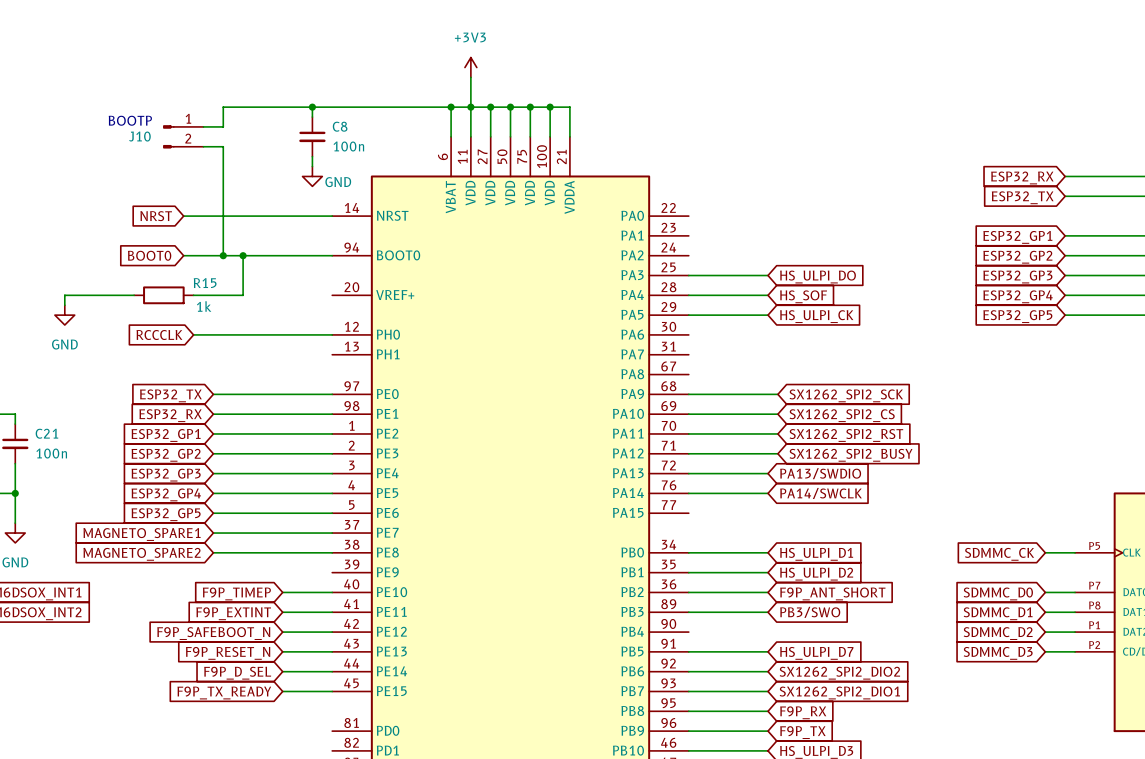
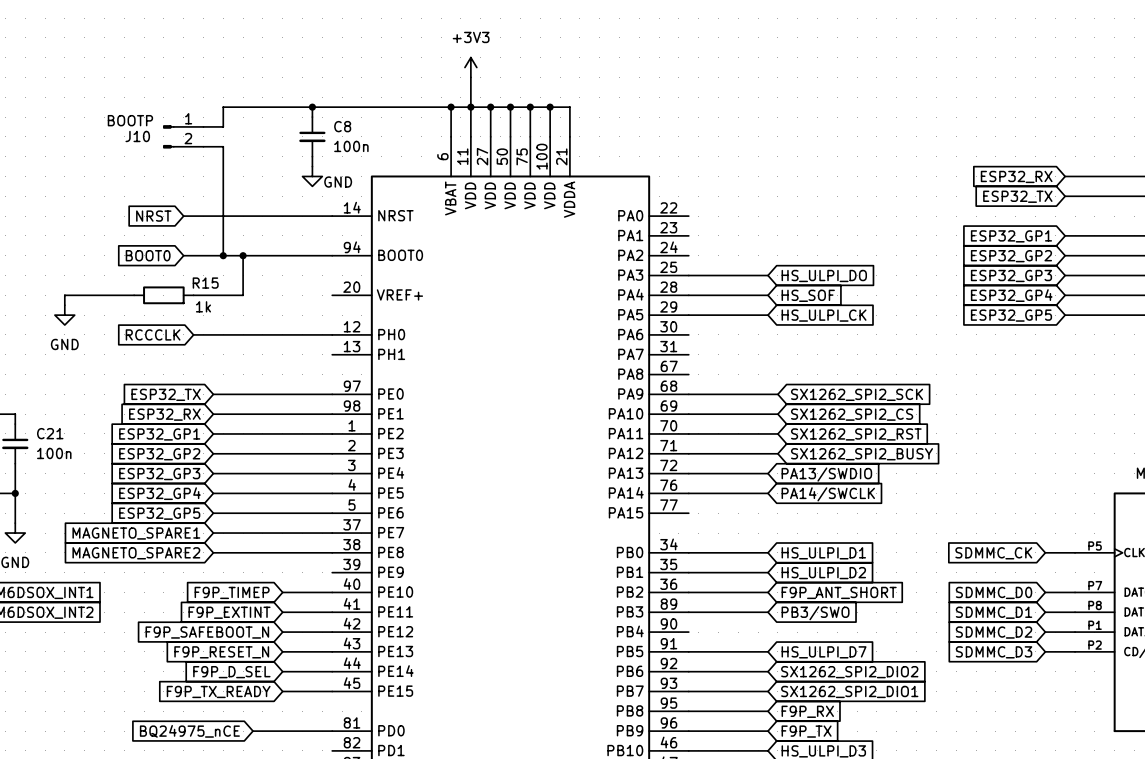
wire: none -> (252, 731) (332, 731)
global label: none -> BQ24975_nCE (189, 731)

